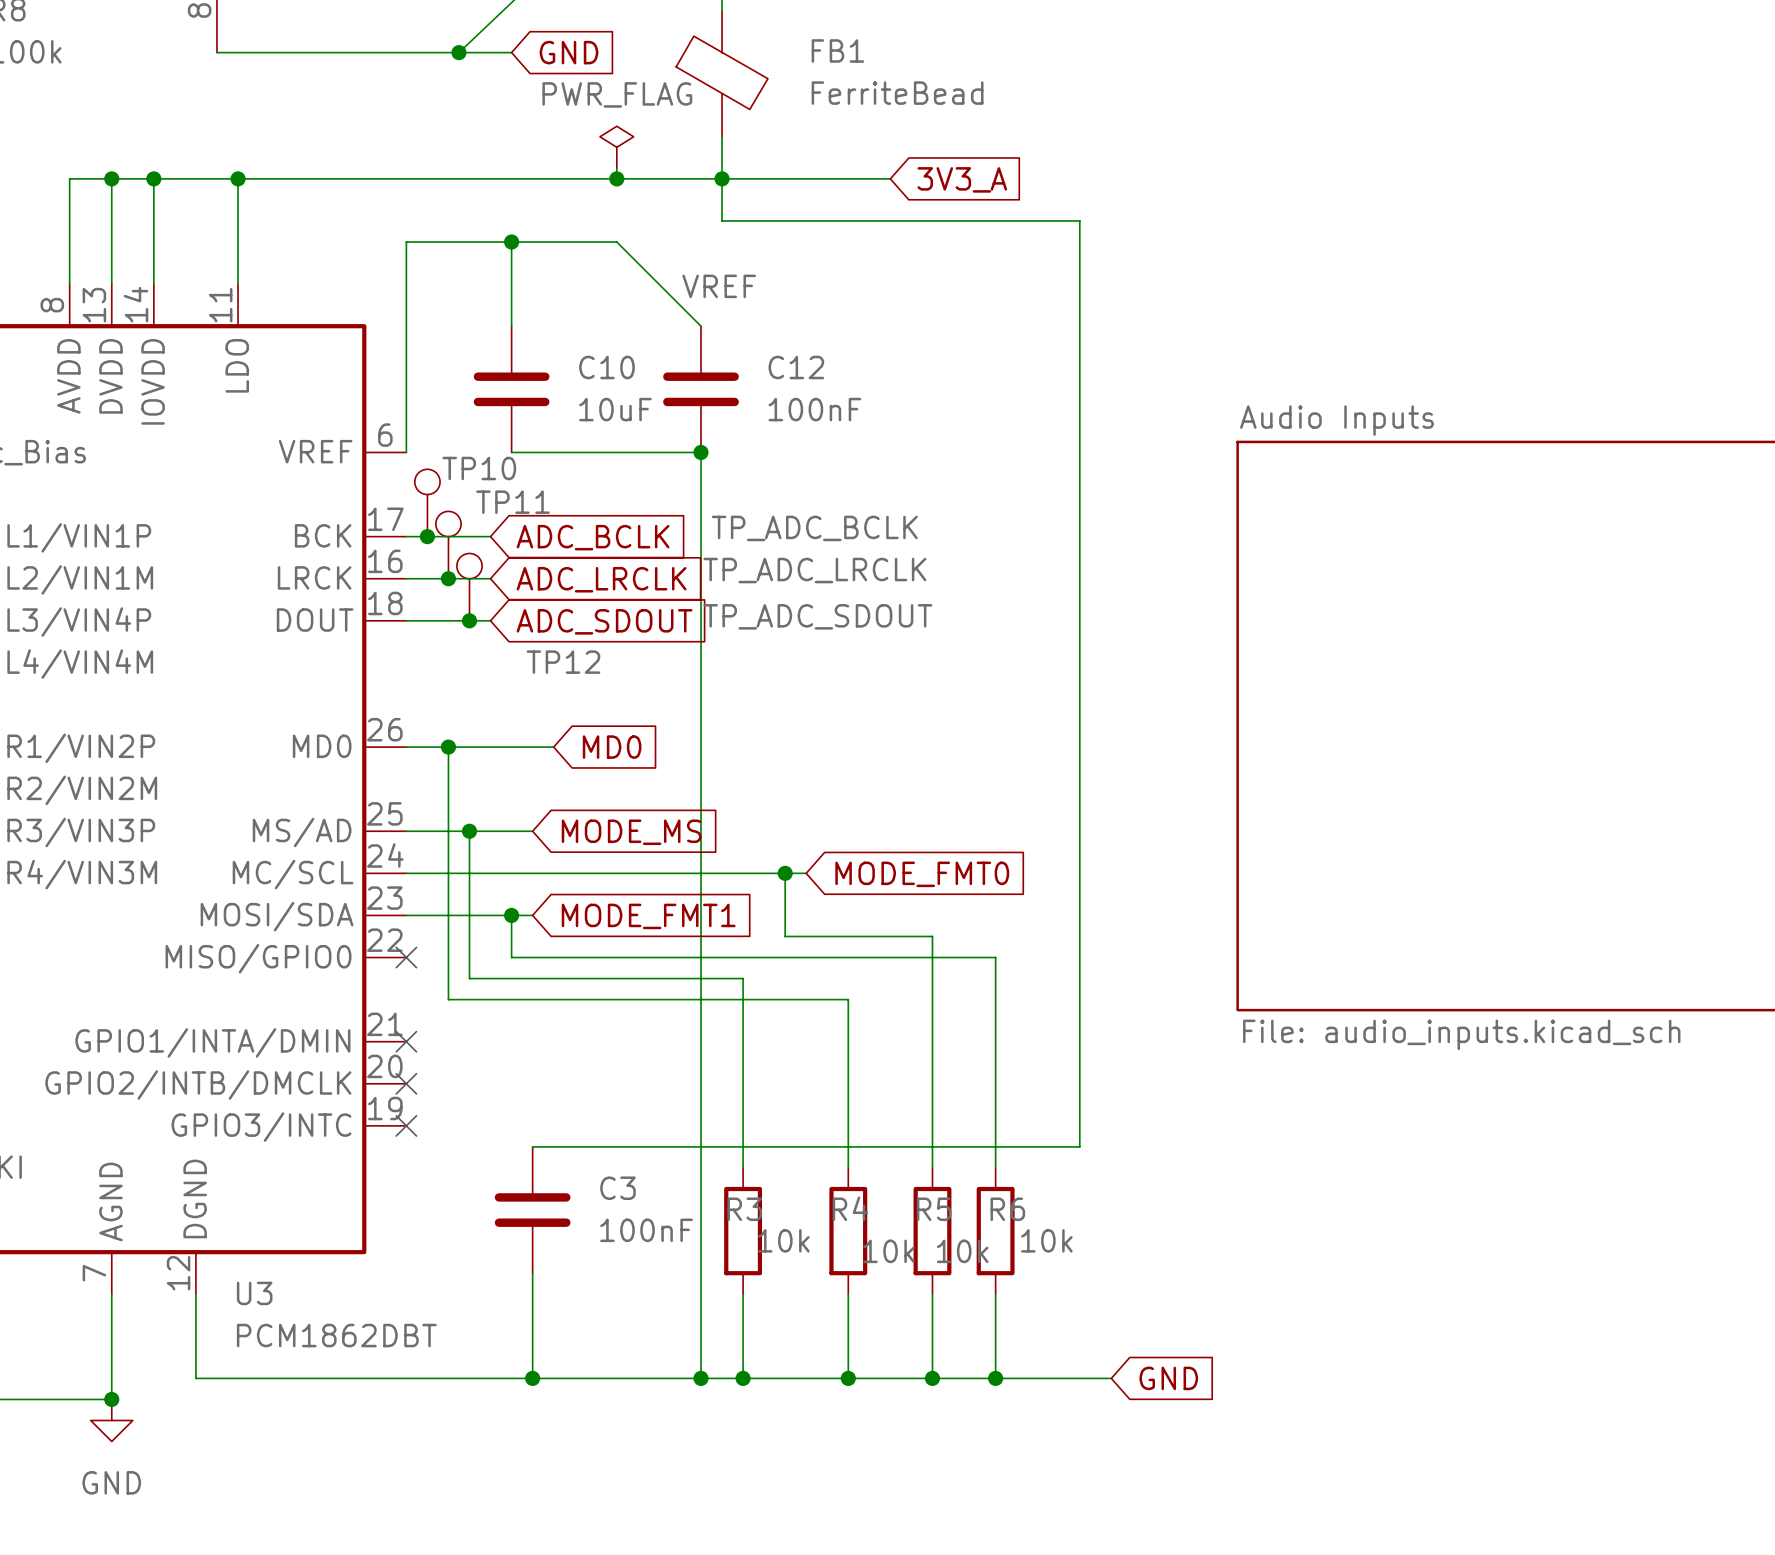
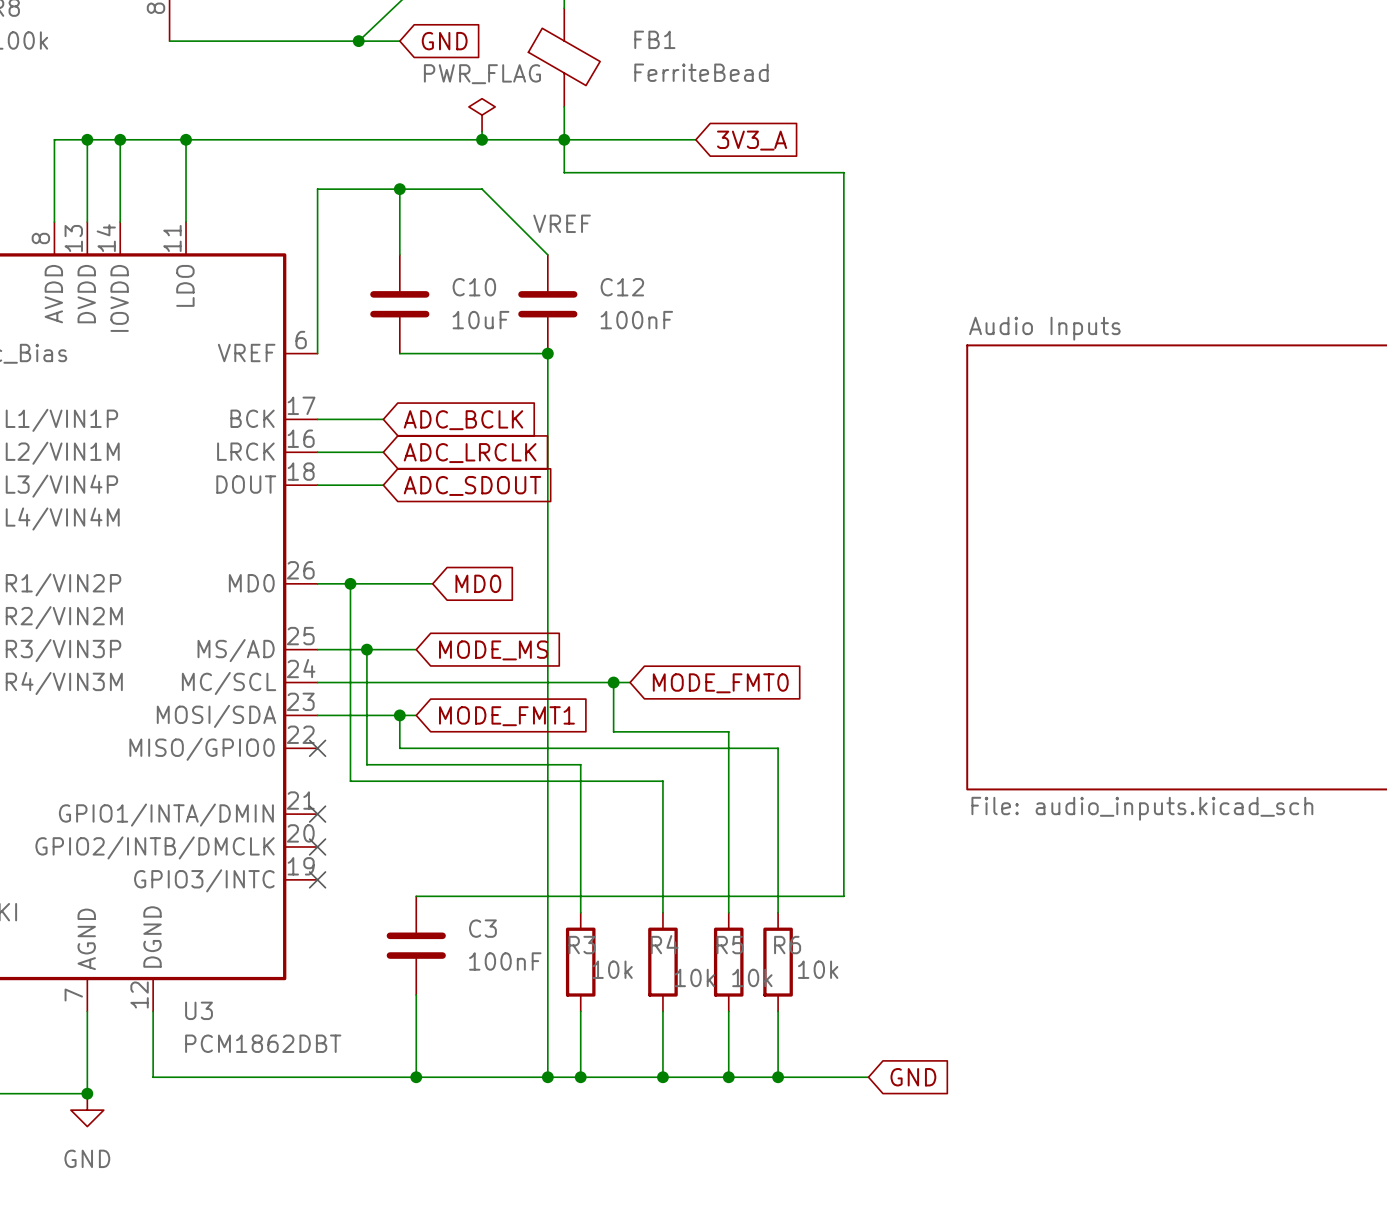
TP10: TP_ADC_BCLK (427, 502) -> none
junction: (427, 536) -> none
TP11: TP_ADC_LRCLK (448, 545) -> none
junction: (448, 578) -> none
TP12: TP_ADC_SDOUT (469, 587) -> none
junction: (469, 620) -> none

